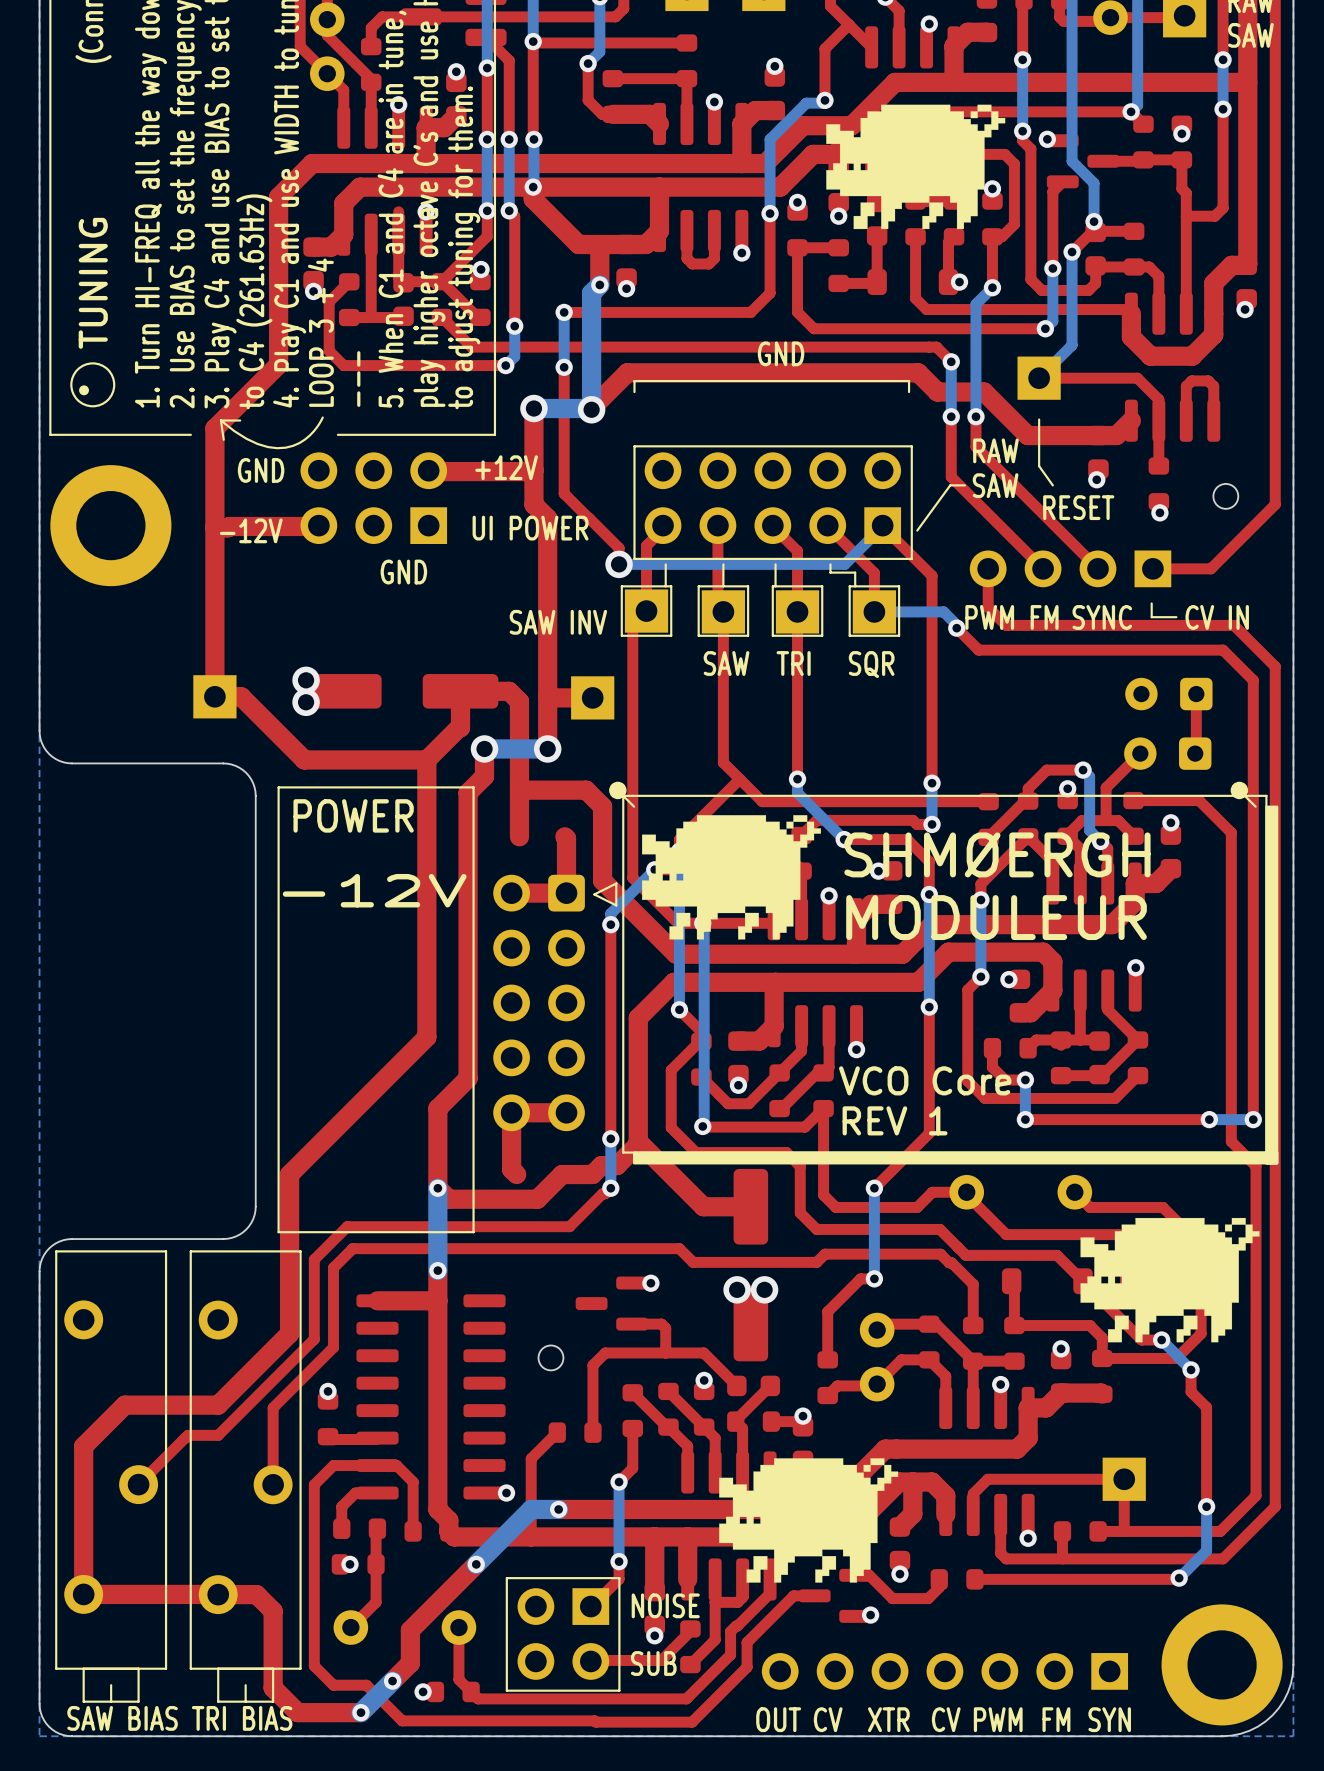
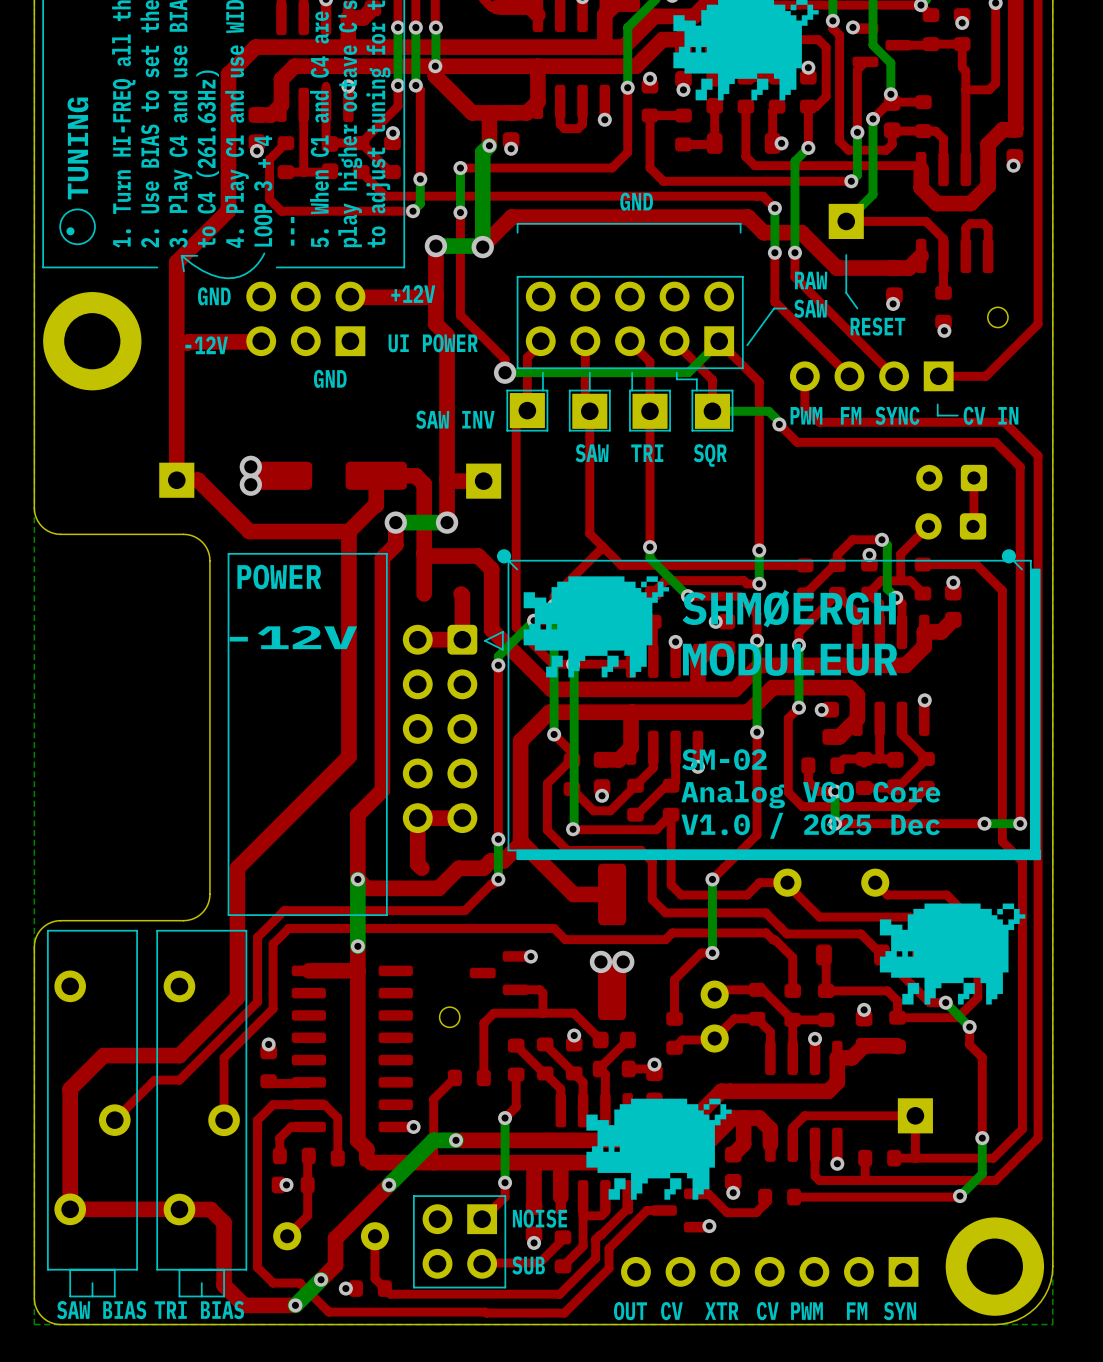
text: none -> SM-02 (724, 759)
text: VCO Core (925, 1080) -> Analog VCO Core (810, 794)
text: REV 1 (895, 1120) -> V1.0 / 2025 Dec (810, 825)

